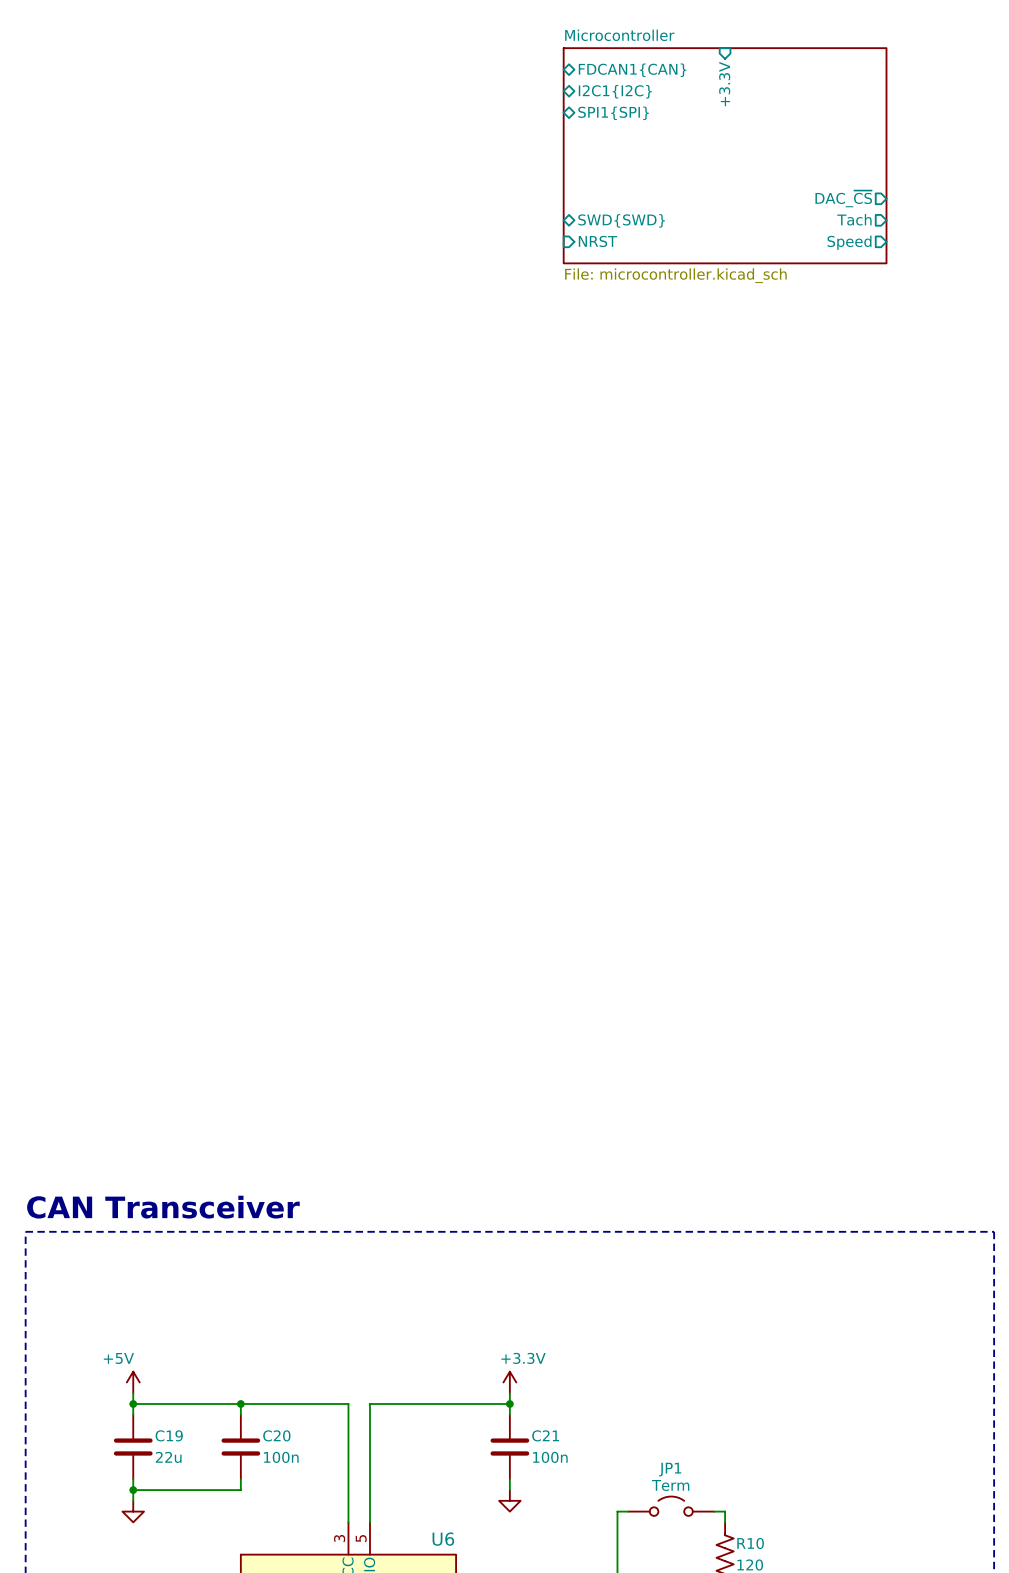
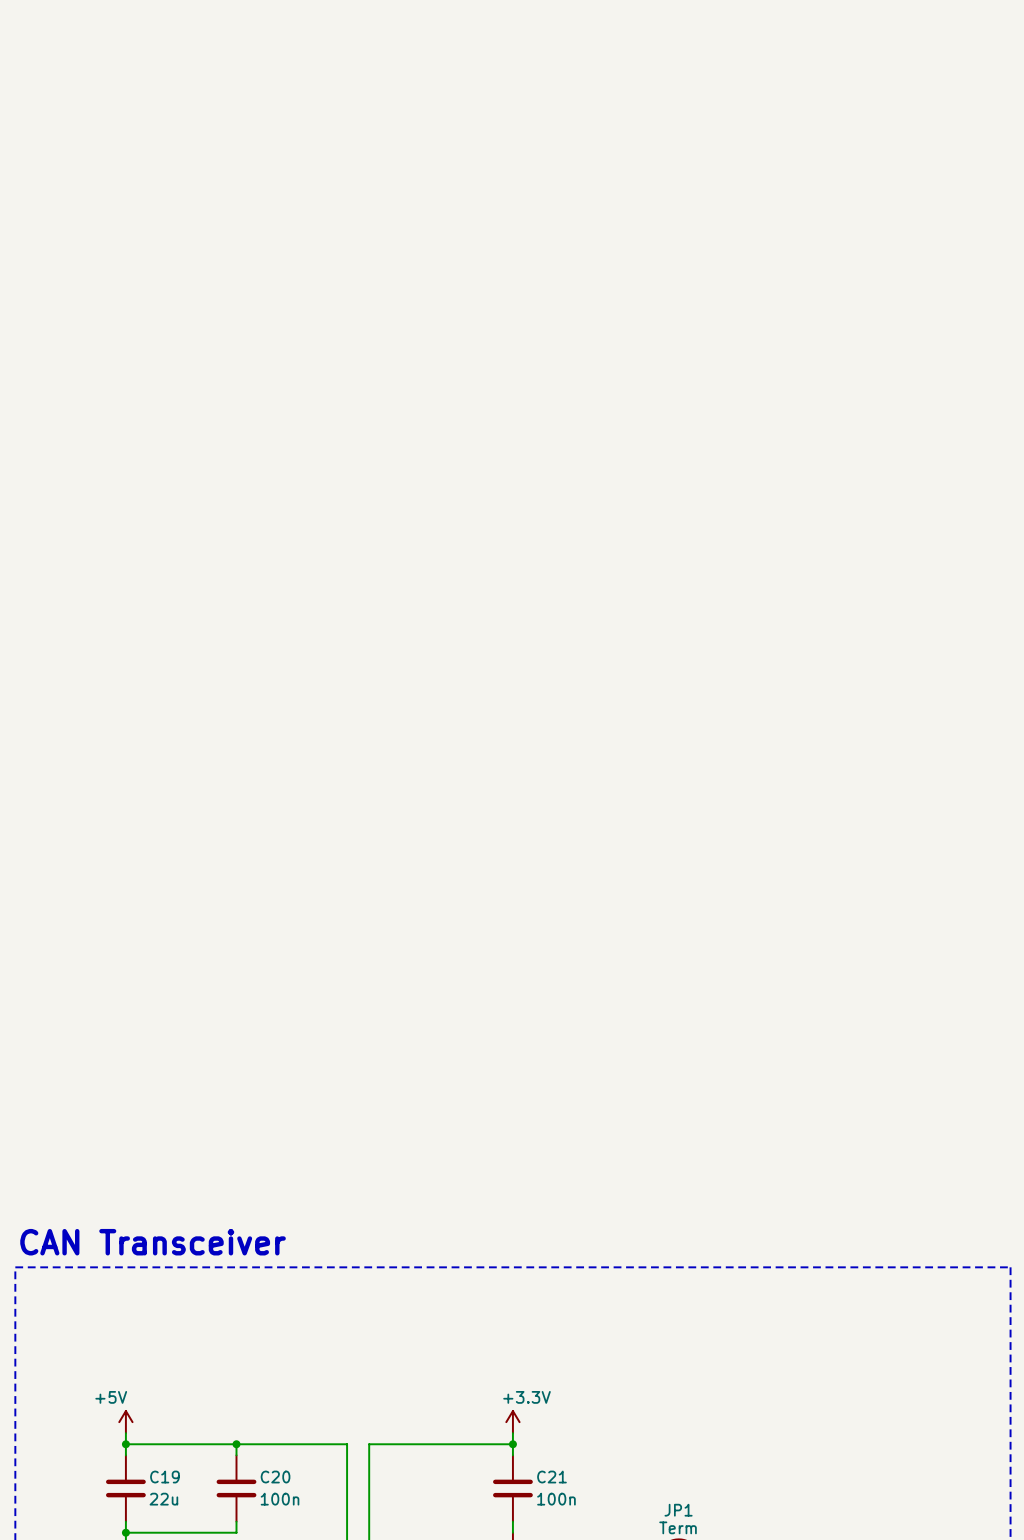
sheet pin: FDCAN1{CAN} (632, 70) -> none
sheet pin: +3.3V (724, 84) -> none
sheet pin: I2C1{I2C} (615, 91) -> none
sheet pin: SPI1{SPI} (613, 113) -> none
sheet Microcontroller: File: microcontroller.kicad_sch (725, 155) -> none
sheet pin: DAC_~{CS} (843, 198) -> none
sheet pin: Tach (854, 219) -> none
sheet pin: SWD{SWD} (621, 220) -> none
sheet pin: NRST (597, 241) -> none
sheet pin: Speed (849, 242) -> none

